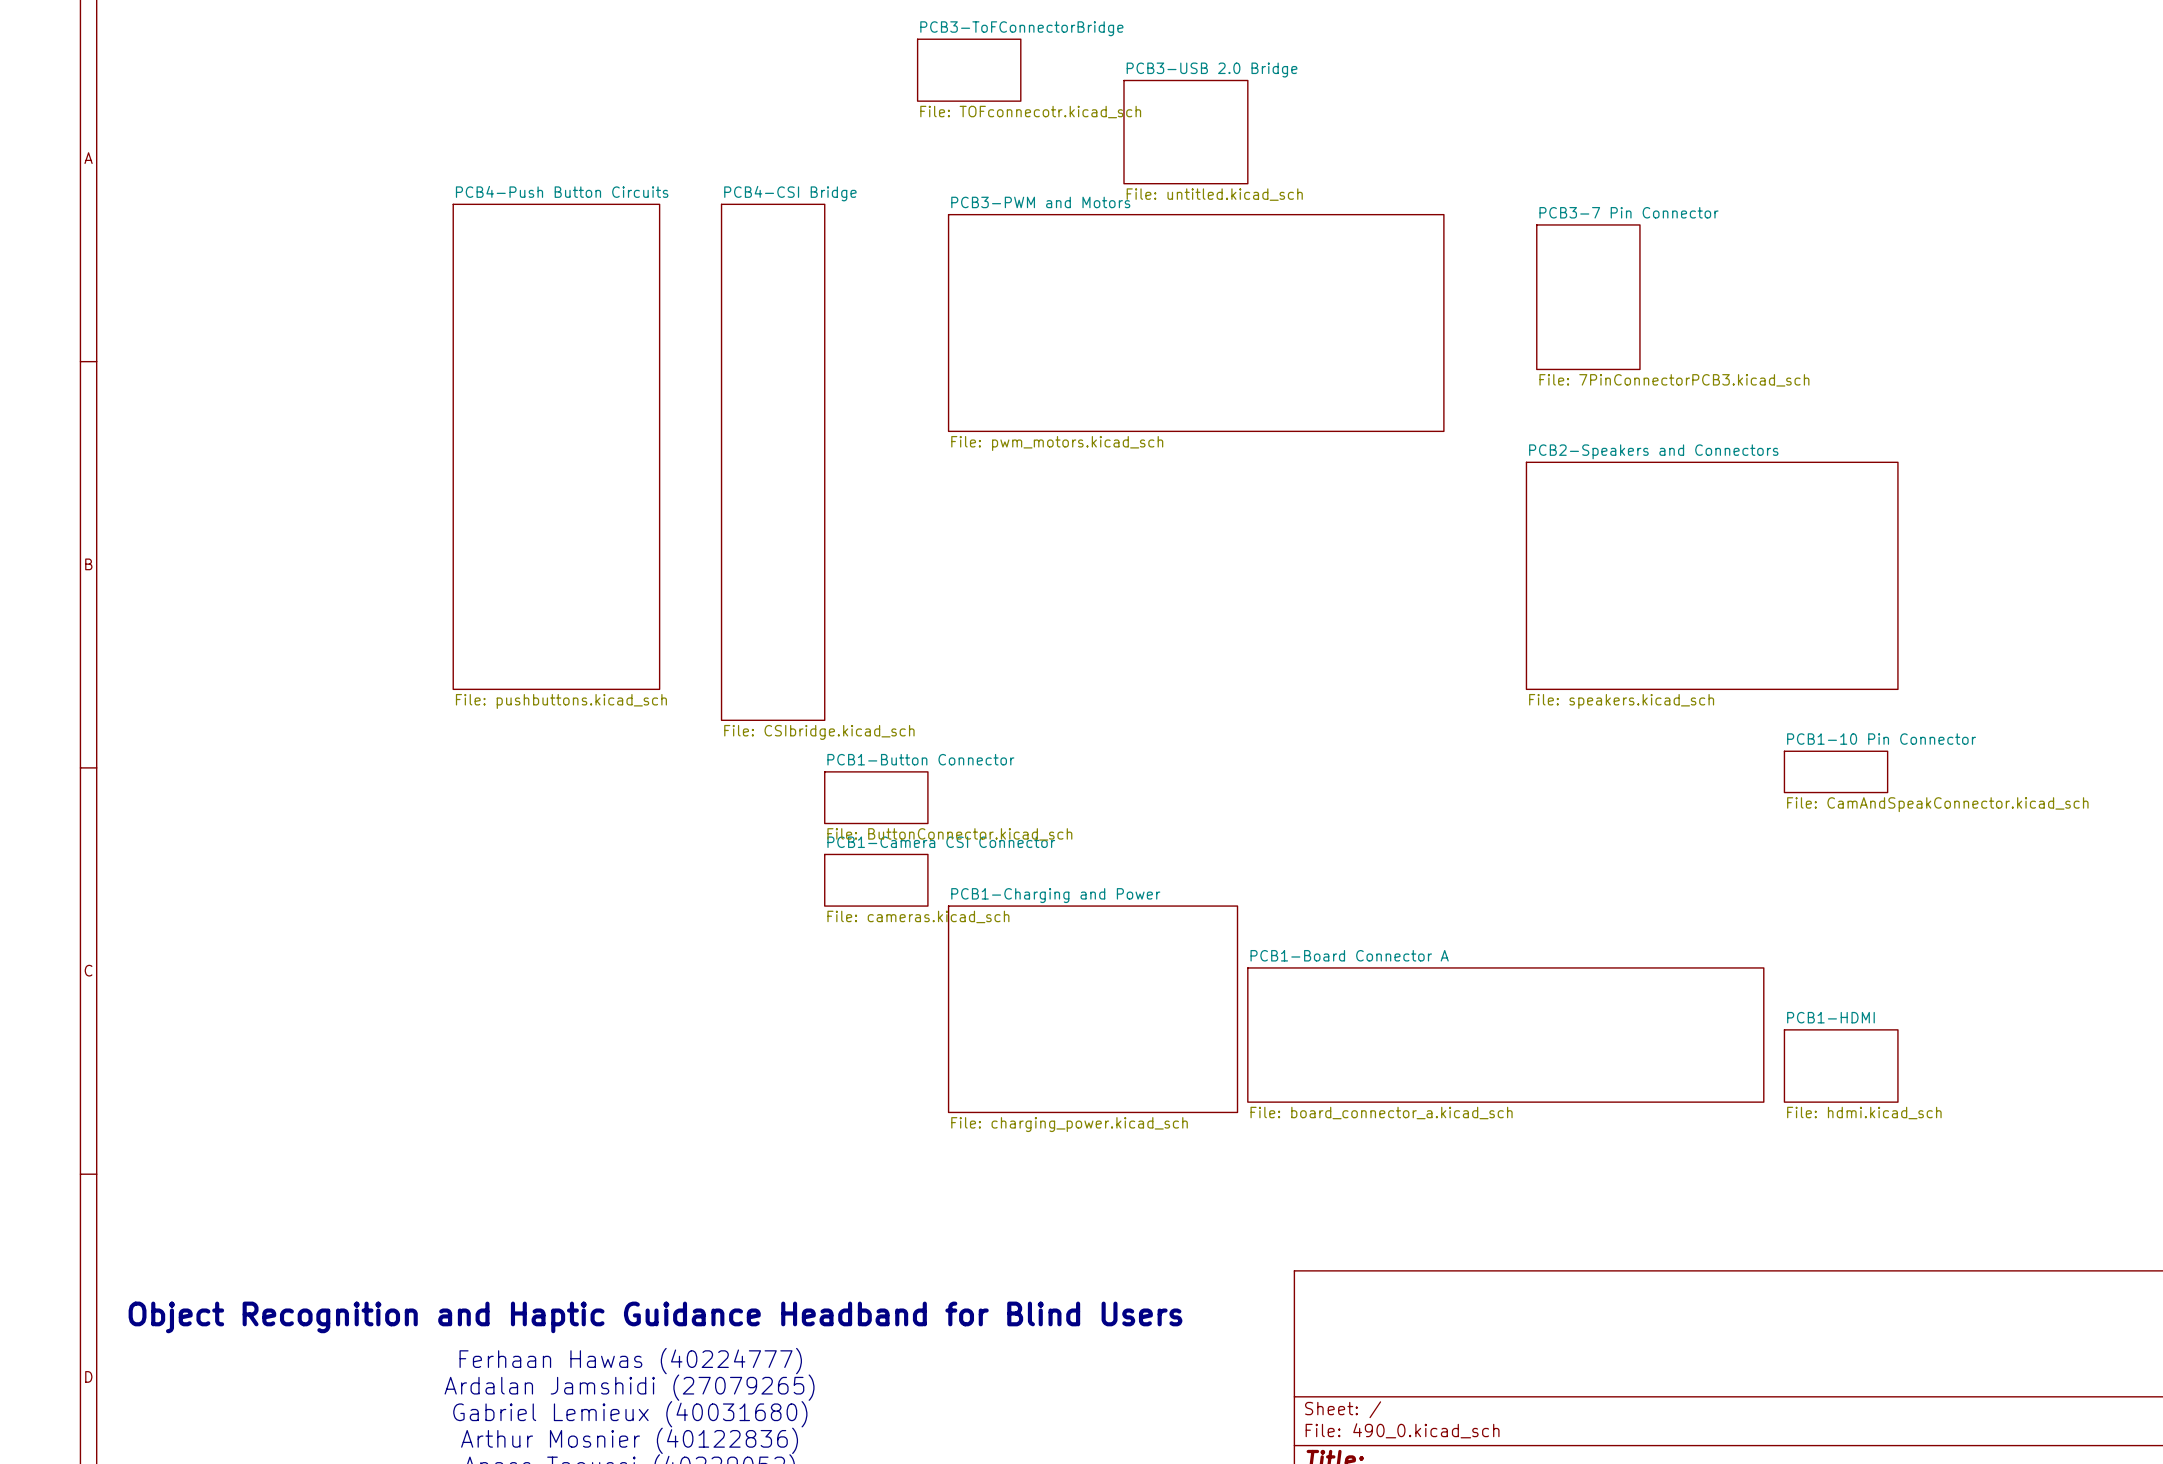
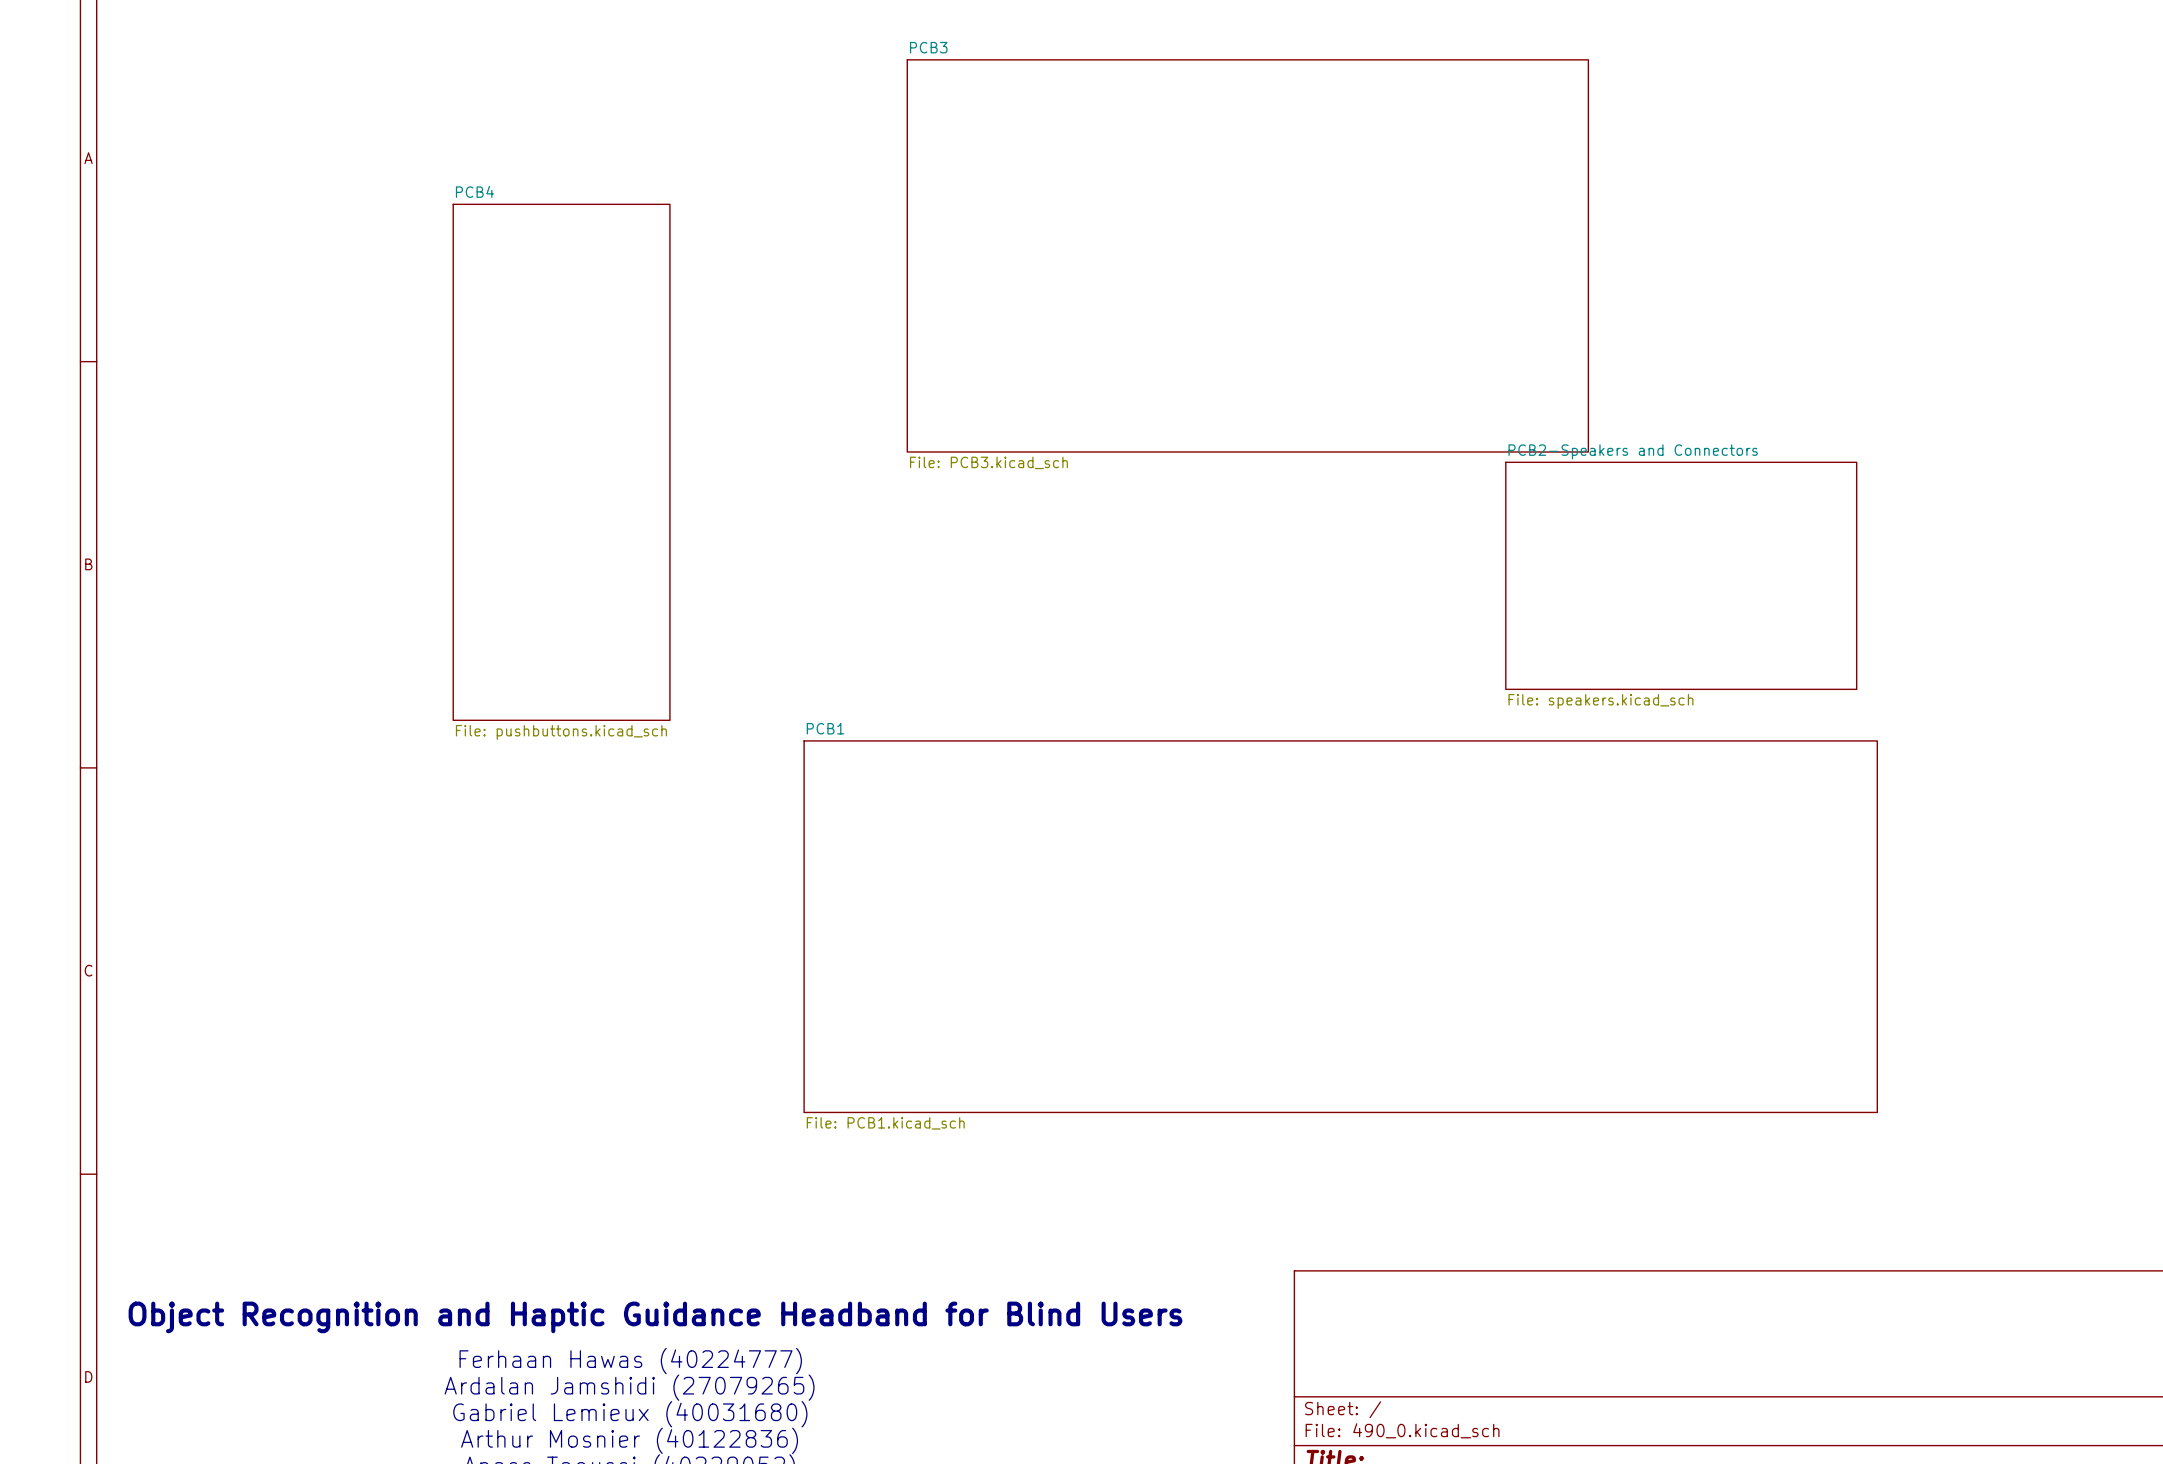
sheet PCB3-ToFConnectorBridge: File: TOFconnecotr.kicad_sch (969, 70) -> none
sheet PCB3-USB 2.0 Bridge: File: untitled.kicad_sch (1185, 132) -> none
sheet PCB3: none -> File: PCB3.kicad_sch (1247, 255)
sheet PCB3-7 Pin Connector: File: 7PinConnectorPCB3.kicad_sch (1588, 297) -> none
sheet PCB3-PWM and Motors: File: pwm_motors.kicad_sch (1196, 323) -> none
sheet PCB4-Push Button Circuits: File: pushbuttons.kicad_sch (556, 446) -> none
sheet PCB2-Speakers and Connectors shape: [1525, 461, 1899, 690] -> [1505, 461, 1858, 690]
sheet PCB4: none -> File: pushbuttons.kicad_sch (561, 462)
sheet PCB4-CSI Bridge: File: CSIbridge.kicad_sch (773, 462) -> none
sheet PCB1-10 Pin Connector: File: CamAndSpeakConnector.kicad_sch (1836, 771) -> none
sheet PCB1-Button Connector: File: ButtonConnector.kicad_sch (876, 797) -> none
sheet PCB1-Camera CSI Connector: File: cameras.kicad_sch (876, 880) -> none
sheet PCB1: none -> File: PCB1.kicad_sch (1340, 926)
sheet PCB1-Charging and Power: File: charging_power.kicad_sch (1093, 1009) -> none
sheet PCB1-Board Connector A: File: board_connector_a.kicad_sch (1505, 1035) -> none
sheet PCB1-HDMI: File: hdmi.kicad_sch (1841, 1066) -> none

